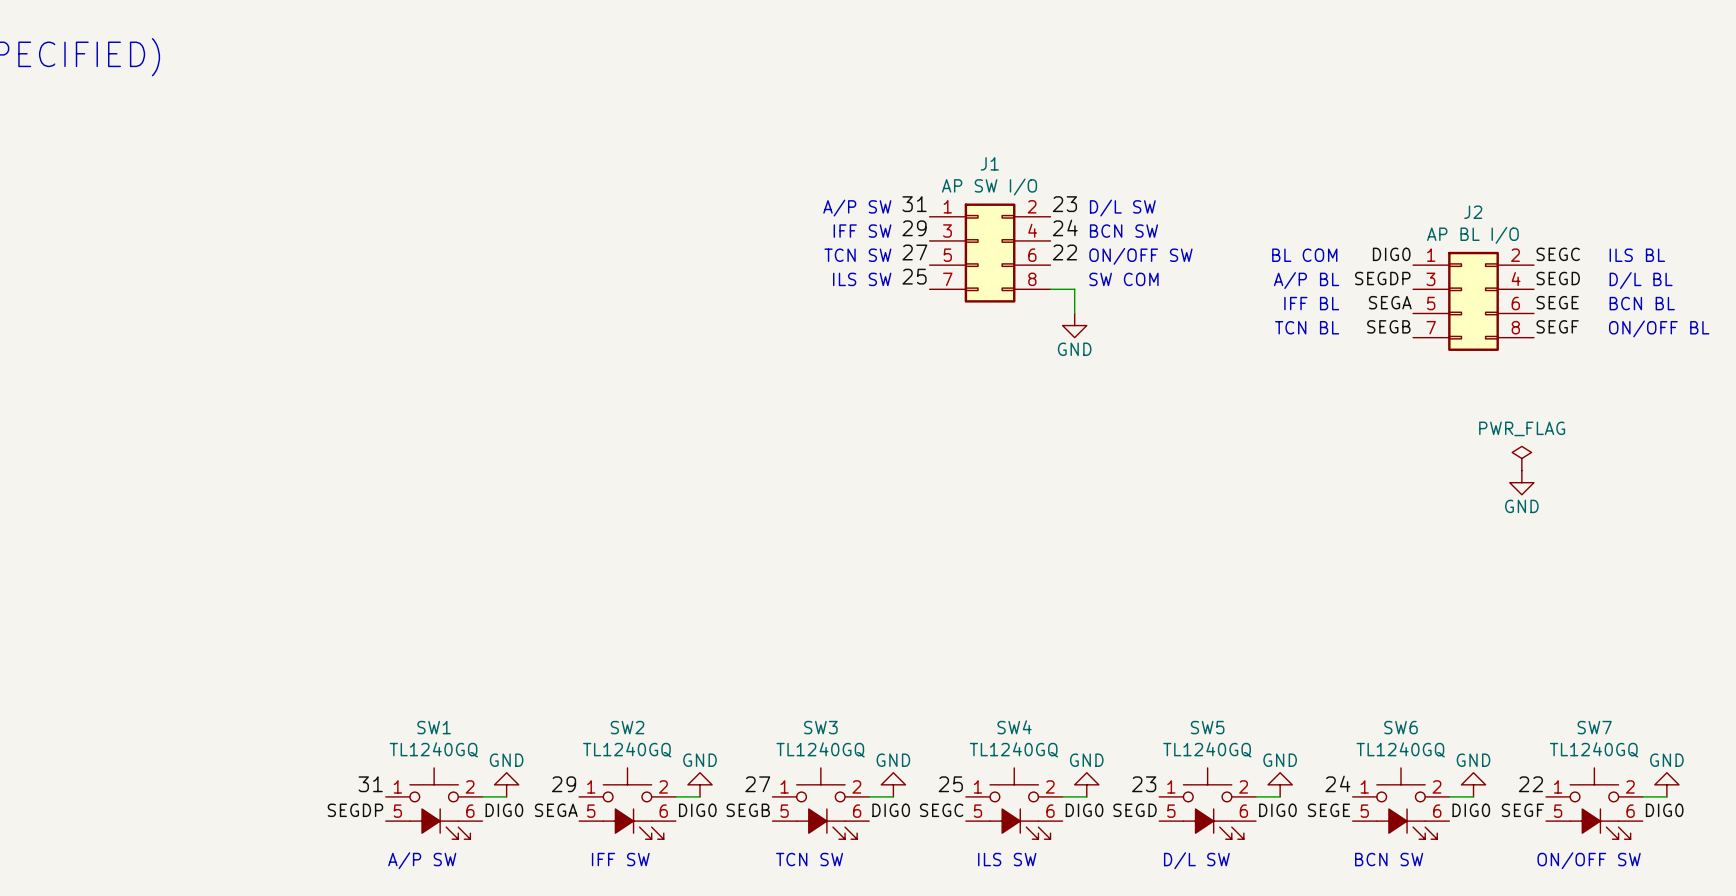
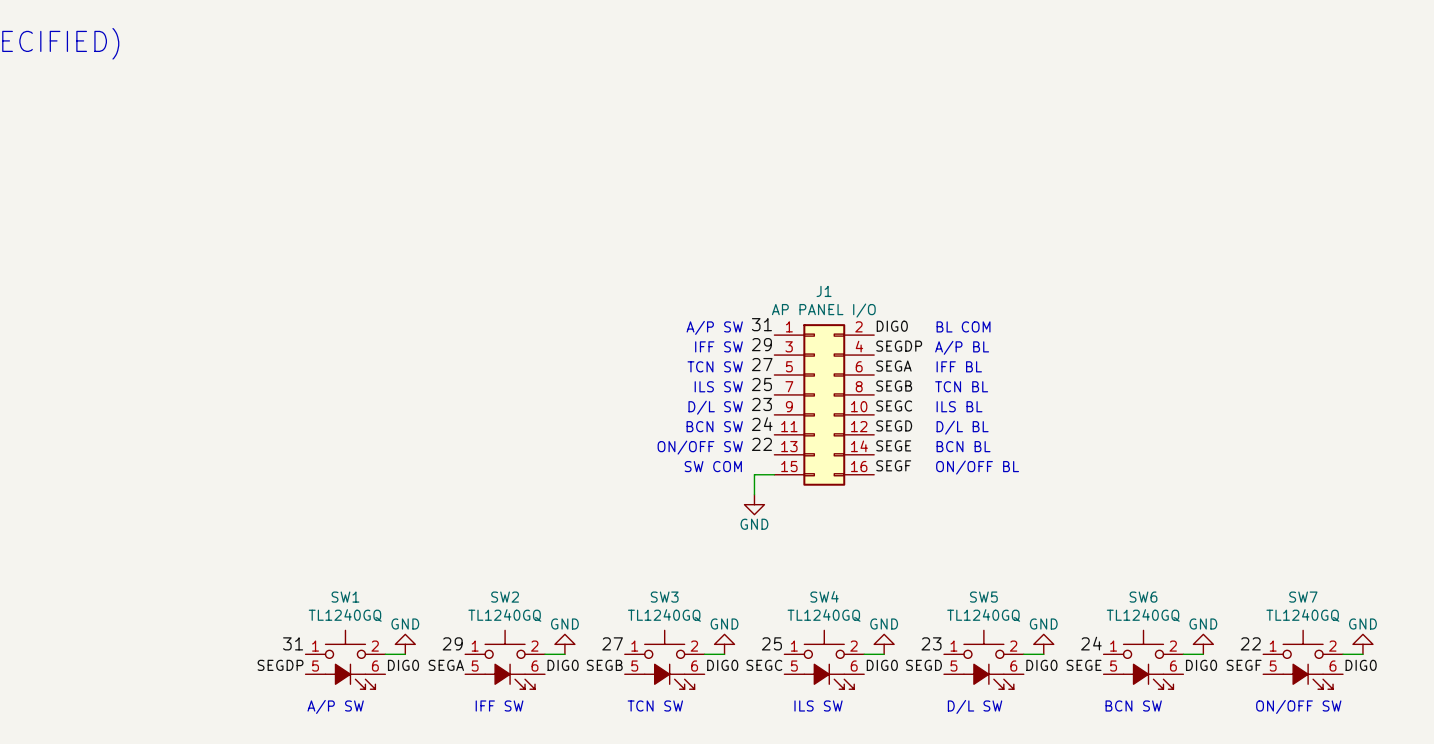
J1 name position: J1 (989, 163) -> J1 (824, 291)
J1 value: AP SW I/O (989, 187) -> AP PANEL I/O (823, 310)
J1 symbol: [929, 203, 1051, 303] -> [774, 324, 875, 486]
label position: 31 (914, 204) -> 31 (761, 324)
label: 23 (1064, 204) -> none
text position: A/P SW (857, 208) -> A/P SW (714, 327)
text: D/L SW (1122, 208) -> none
label: 24 (1065, 227) -> none
label position: 29 (914, 228) -> 29 (761, 344)
text position: IFF SW (862, 231) -> IFF SW (718, 346)
text: BCN SW (1123, 231) -> none
label position: 27 (914, 252) -> 27 (762, 364)
label: 22 (1064, 252) -> none
label: DIG0 (1391, 254) -> none
label: SEGC (1558, 254) -> none
text position: TCN SW (857, 255) -> TCN SW (715, 366)
text: BL COM (1304, 255) -> none
text: ILS BL (1637, 255) -> none
text: ON/OFF SW (1140, 256) -> none
label position: 25 (914, 276) -> 25 (761, 384)
label: SEGDP (1382, 278) -> none
label: SEGD (1558, 278) -> none
text position: ILS SW (862, 279) -> ILS SW (718, 386)
text: SW COM (1123, 279) -> none
text: A/P BL (1306, 280) -> none
text: D/L BL (1641, 280) -> none
wire: (1050, 289) (1074, 289) (1074, 313) -> none
J2: AP BL I/O (1473, 301) -> none
label: SEGA (1390, 302) -> none
label: SEGE (1557, 302) -> none
text: IFF BL (1311, 303) -> none
text: BCN BL (1642, 303) -> none
power symbol: GND (1074, 325) -> none
label: SEGB (1388, 326) -> none
label: SEGF (1557, 326) -> none
text: TCN BL (1307, 327) -> none
text: ON/OFF BL (1659, 328) -> none
label: none -> DIG0 (892, 326)
text: none -> BL COM (963, 326)
label: none -> SEGDP (899, 346)
text: none -> A/P BL (962, 347)
label: none -> SEGA (893, 366)
text: none -> IFF BL (959, 366)
power symbol: PWR_FLAG (1521, 458) -> none
label: none -> SEGB (894, 386)
text: none -> TCN BL (961, 386)
power symbol: GND (1521, 482) -> none
label: none -> 23 (761, 404)
label: none -> SEGC (894, 406)
text: none -> ILS BL (959, 406)
text: none -> D/L SW (715, 407)
label: none -> 24 (762, 424)
label: none -> SEGD (894, 425)
text: none -> BCN SW (714, 426)
text: none -> D/L BL (962, 427)
label: none -> 22 (761, 444)
label: none -> SEGE (893, 445)
text: none -> BCN BL (963, 446)
text: none -> ON/OFF SW (700, 447)
label: none -> SEGF (893, 465)
text: none -> SW COM (713, 466)
text: none -> ON/OFF BL (977, 467)
wire: none -> (774, 474) (754, 474) (754, 494)
power symbol: none -> GND (754, 504)

